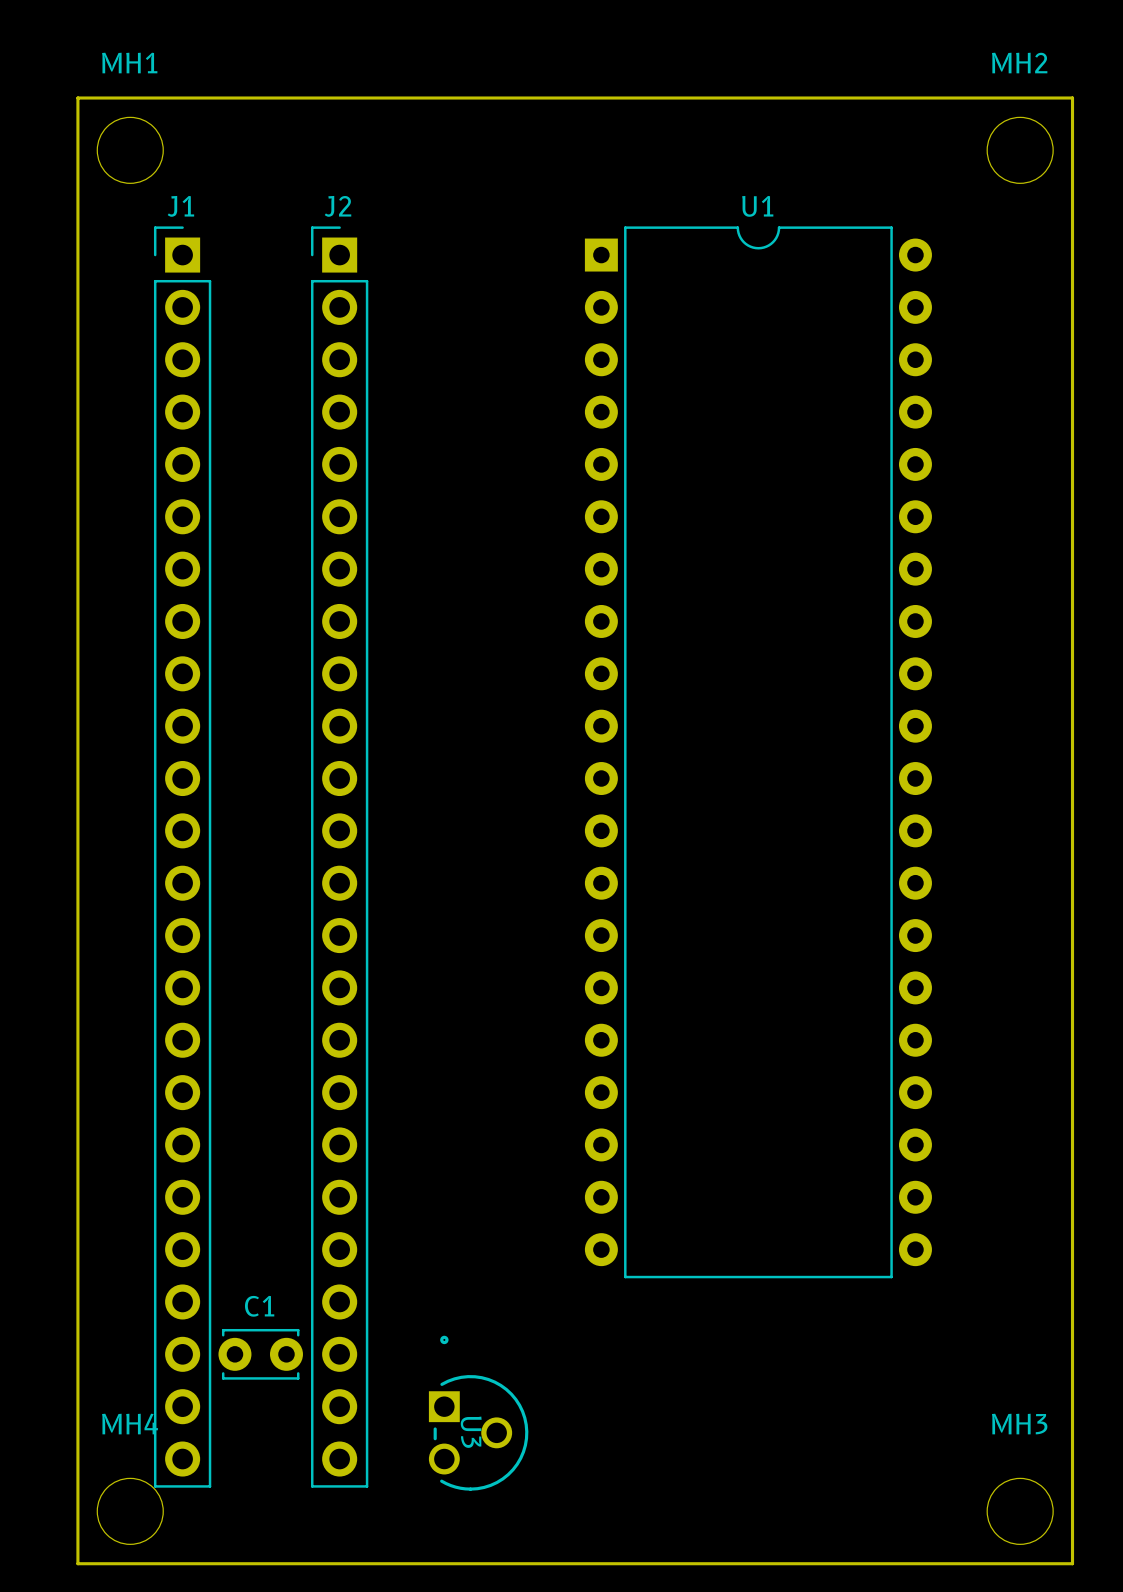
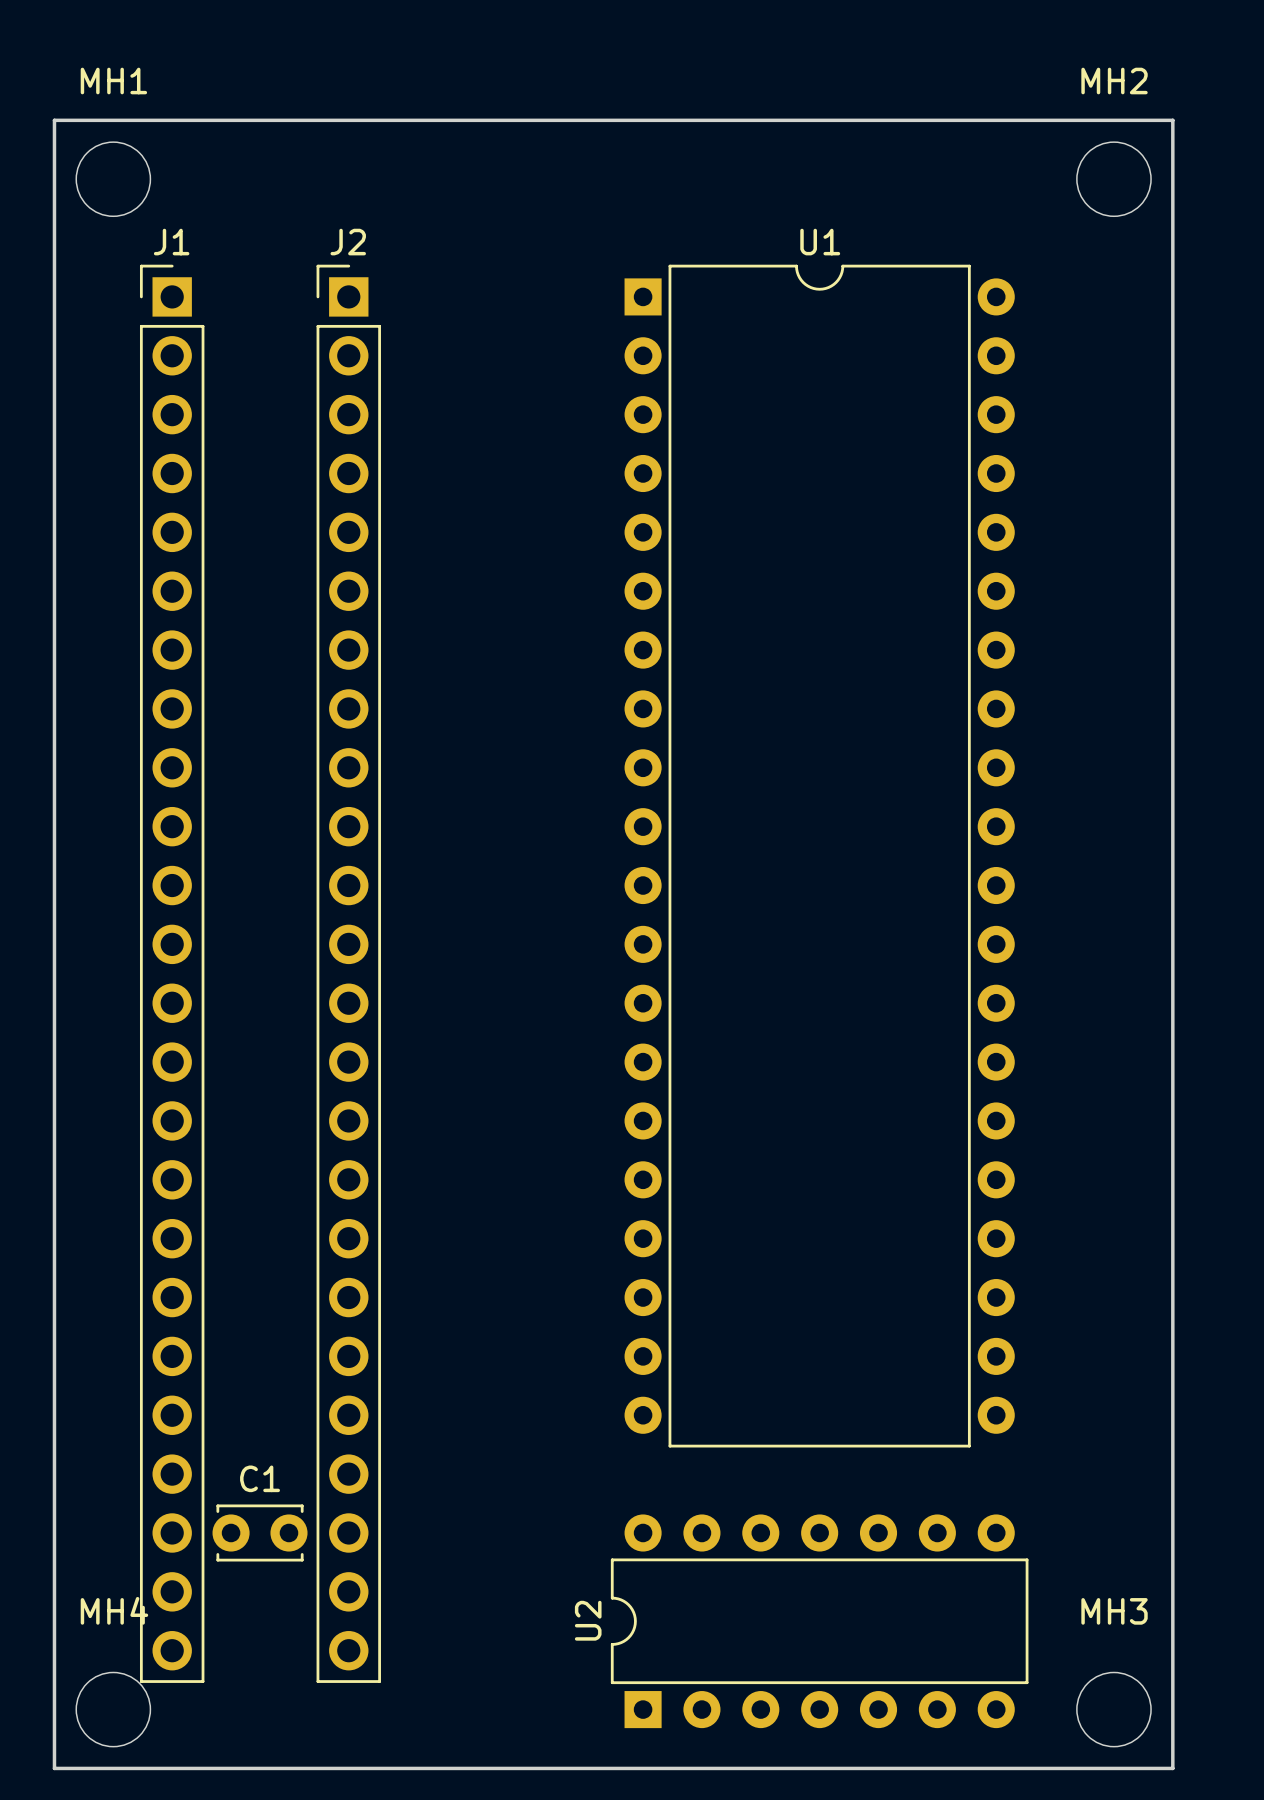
U3: (478, 1413) -> none
U2: none -> (819, 1621)

